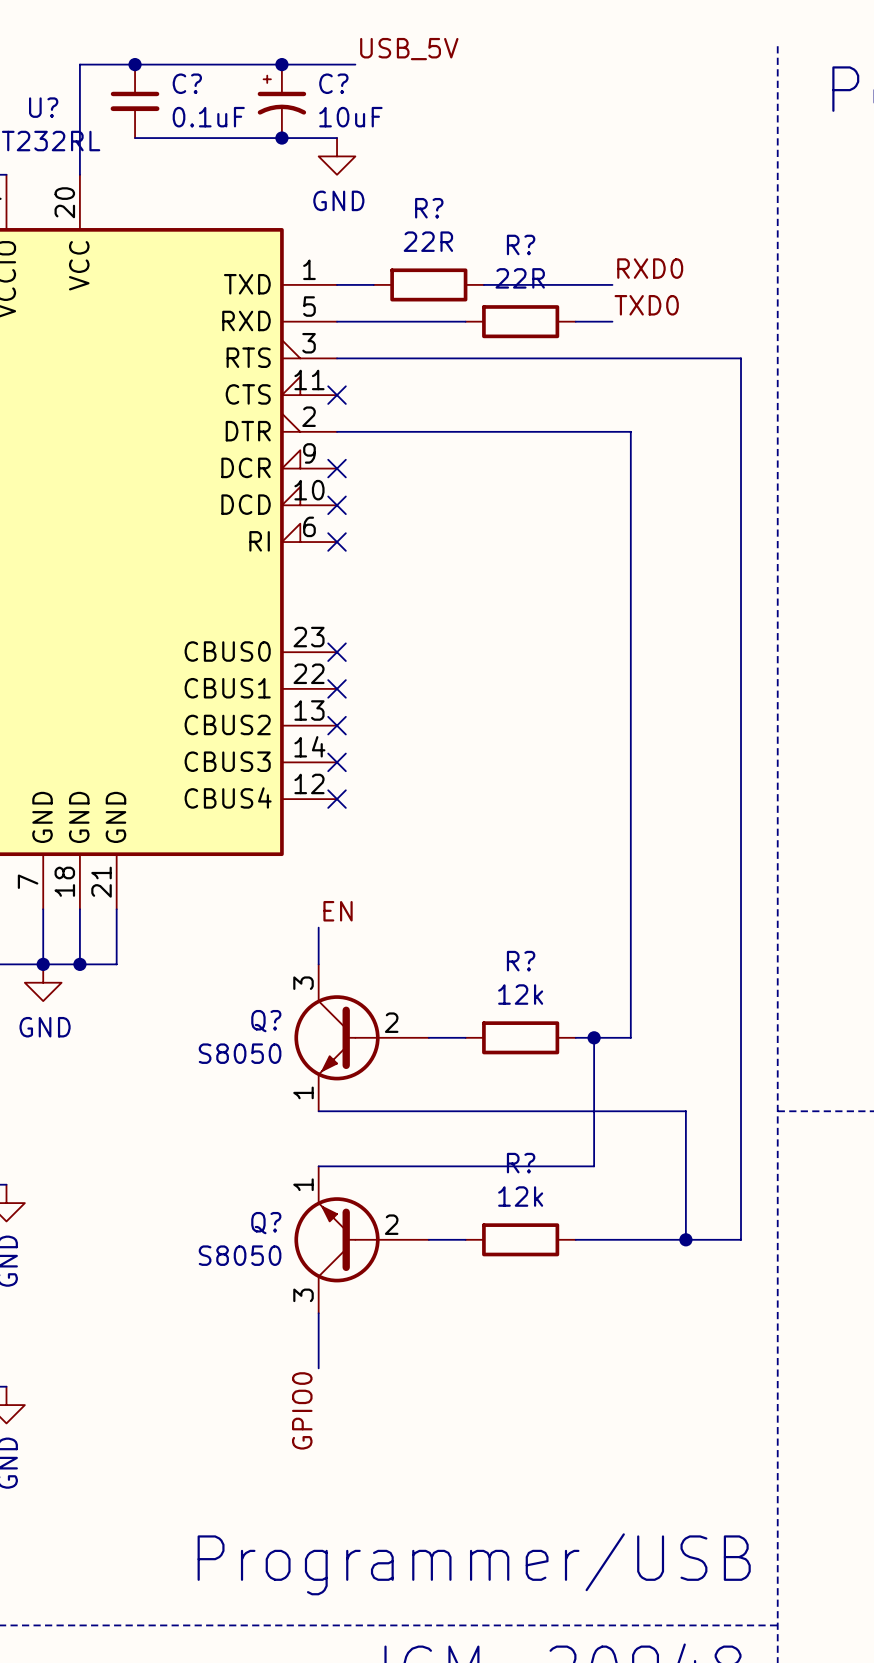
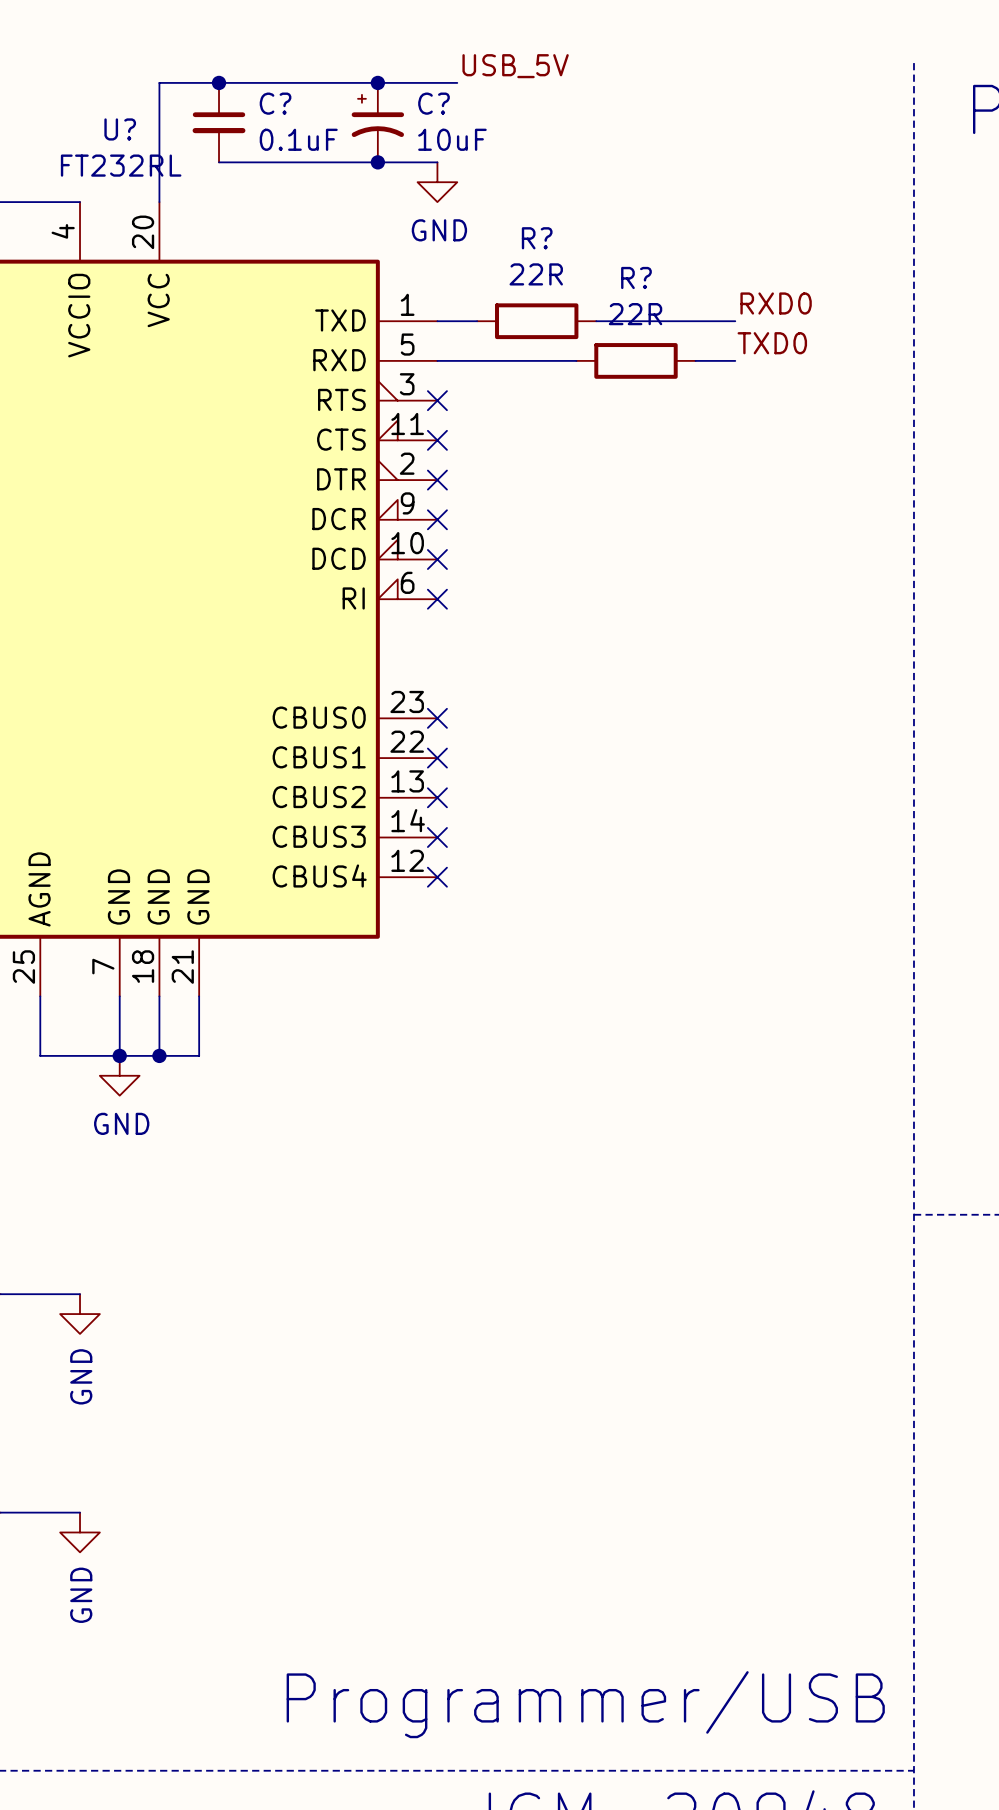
wire: (337, 358) (741, 358) (741, 1239) (575, 1239) -> none
no-connect mark: none -> (437, 400)
wire: (337, 431) (630, 431) (630, 1037) (575, 1037) -> none
no-connect mark: none -> (437, 480)
label: EN (338, 911) -> none
wire: (318, 927) (318, 964) -> none
Q?: S8050 (361, 1037) -> none
wire: (428, 1037) (465, 1037) -> none
R?: 12k (520, 1037) -> none
wire: (594, 1037) (594, 1166) (318, 1166) -> none
junction: (594, 1037) -> none
wire: (318, 1111) (685, 1111) (685, 1239) -> none
Q?: S8050 (361, 1239) -> none
wire: (428, 1239) (465, 1239) -> none
R?: 12k (520, 1239) -> none
junction: (685, 1239) -> none
wire: (318, 1313) (318, 1368) -> none
label: GPIO0 (302, 1410) -> none

